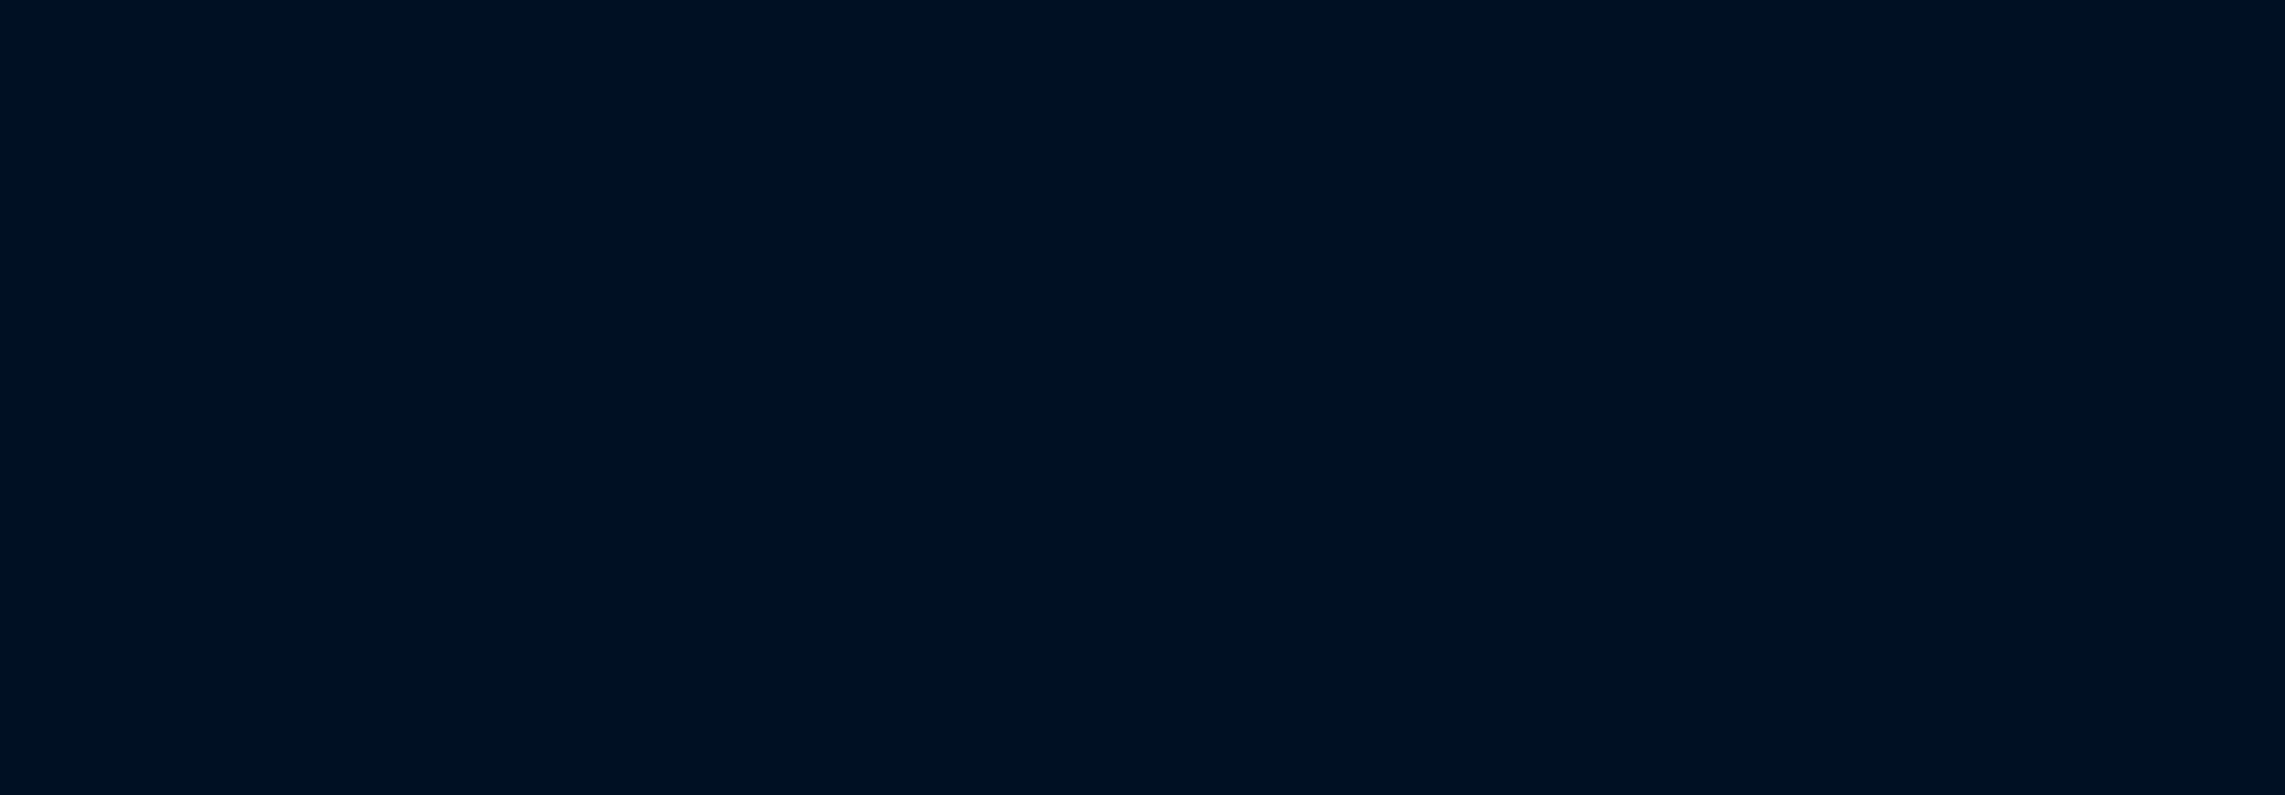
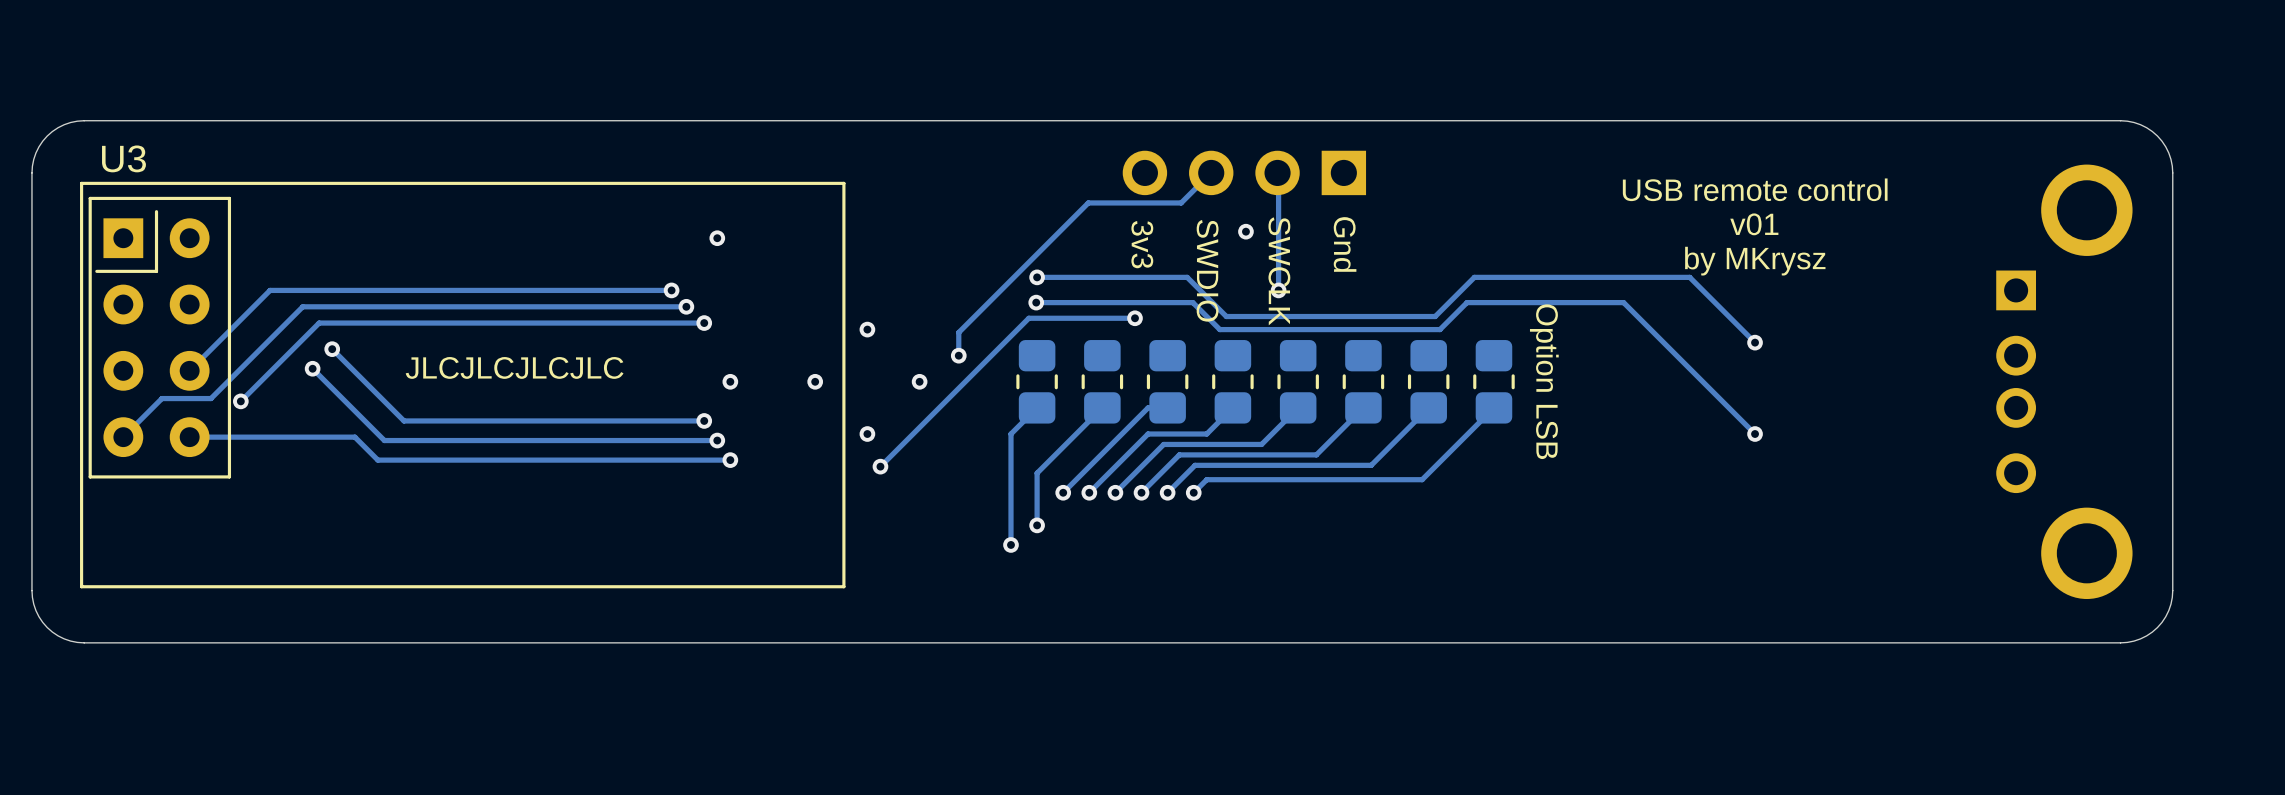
board edge: none -> (2120, 120) (84, 120) (70, 122) (58, 127) (47, 136) (35, 152) (32, 166) (31, 590) (33, 604) (42, 622) (52, 632) (70, 641) (84, 642) (2120, 642) (2134, 641) (2146, 635) (2161, 622) (2168, 610) (2172, 597) (2172, 172) (2168, 152) (2157, 136) (2140, 124) (2120, 120)
track: none -> (1211, 172) (1181, 202) (1088, 202) (958, 332) (958, 355)
part: none -> (1244, 172)
track: none -> (1277, 172) (1278, 290)
text: none -> USB remote control (1755, 189)
text: none -> v01 (1754, 224)
via: none -> (1245, 231)
via: none -> (717, 238)
text: none -> 3v3 (1142, 244)
text: none -> Gnd (1345, 244)
text: none -> by MKrysz (1755, 261)
text: none -> SWDIO (1207, 270)
text: none -> SWCLK (1279, 271)
track: none -> (1037, 277) (1187, 277) (1226, 316) (1435, 316) (1474, 277) (1689, 277) (1755, 342)
via: none -> (1037, 277)
track: none -> (671, 290) (270, 290) (189, 370)
via: none -> (671, 290)
via: none -> (1278, 290)
track: none -> (1036, 302) (1192, 302) (1219, 329) (1440, 329) (1466, 302) (1623, 302) (1755, 434)
via: none -> (1036, 302)
track: none -> (686, 306) (302, 306) (211, 398) (161, 398) (123, 437)
via: none -> (686, 306)
track: none -> (1135, 318) (1028, 318) (880, 466)
via: none -> (1135, 318)
track: none -> (704, 323) (319, 323) (240, 401)
via: none -> (704, 323)
via: none -> (867, 329)
via: none -> (1755, 342)
track: none -> (332, 349) (404, 420) (704, 420)
via: none -> (332, 349)
via: none -> (958, 355)
text: none -> JLCJLCJLCJLC (514, 367)
track: none -> (312, 368) (384, 440) (717, 440)
via: none -> (312, 368)
via: none -> (730, 381)
via: none -> (815, 381)
via: none -> (919, 381)
part: none -> (1037, 381)
part: none -> (1102, 381)
part: none -> (1167, 381)
part: none -> (1232, 381)
part: none -> (1298, 381)
part: none -> (1363, 381)
part: none -> (1428, 381)
part: none -> (1493, 381)
text: none -> Option LSB (1544, 381)
part: none -> (2064, 381)
U3: none -> (462, 385)
via: none -> (240, 401)
track: none -> (1037, 407) (1010, 434) (1010, 544)
track: none -> (1102, 407) (1037, 473) (1037, 525)
track: none -> (1167, 407) (1148, 407) (1063, 492)
track: none -> (1232, 407) (1206, 434) (1148, 434) (1089, 492)
track: none -> (1298, 407) (1261, 444) (1163, 444) (1115, 492)
track: none -> (1363, 407) (1316, 454) (1179, 454) (1141, 492)
track: none -> (1428, 407) (1371, 465) (1195, 465) (1167, 492)
track: none -> (1493, 407) (1422, 479) (1206, 479) (1193, 492)
via: none -> (704, 420)
via: none -> (867, 434)
via: none -> (1755, 434)
track: none -> (189, 437) (354, 437) (377, 460) (730, 460)
via: none -> (717, 440)
via: none -> (730, 460)
via: none -> (880, 466)
via: none -> (1063, 492)
via: none -> (1089, 492)
via: none -> (1115, 492)
via: none -> (1141, 492)
via: none -> (1167, 492)
via: none -> (1193, 492)
via: none -> (1037, 525)
via: none -> (1010, 544)

